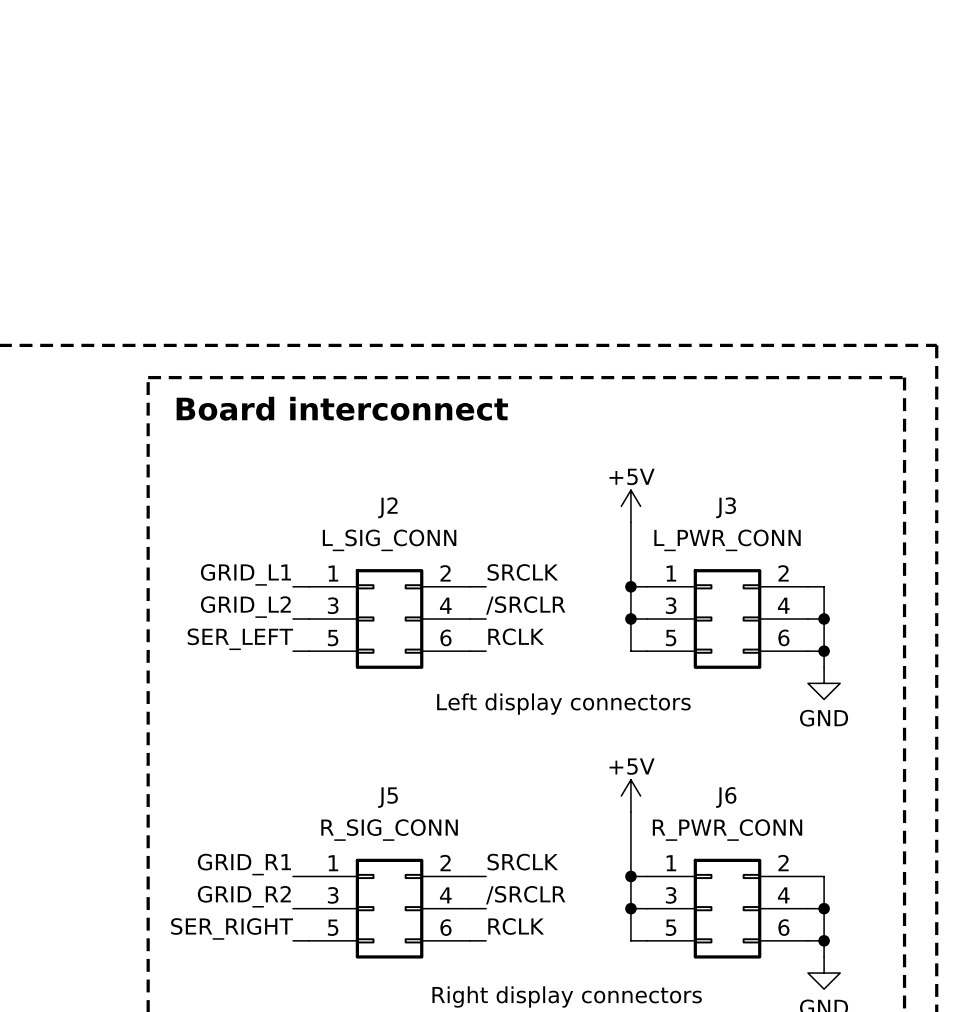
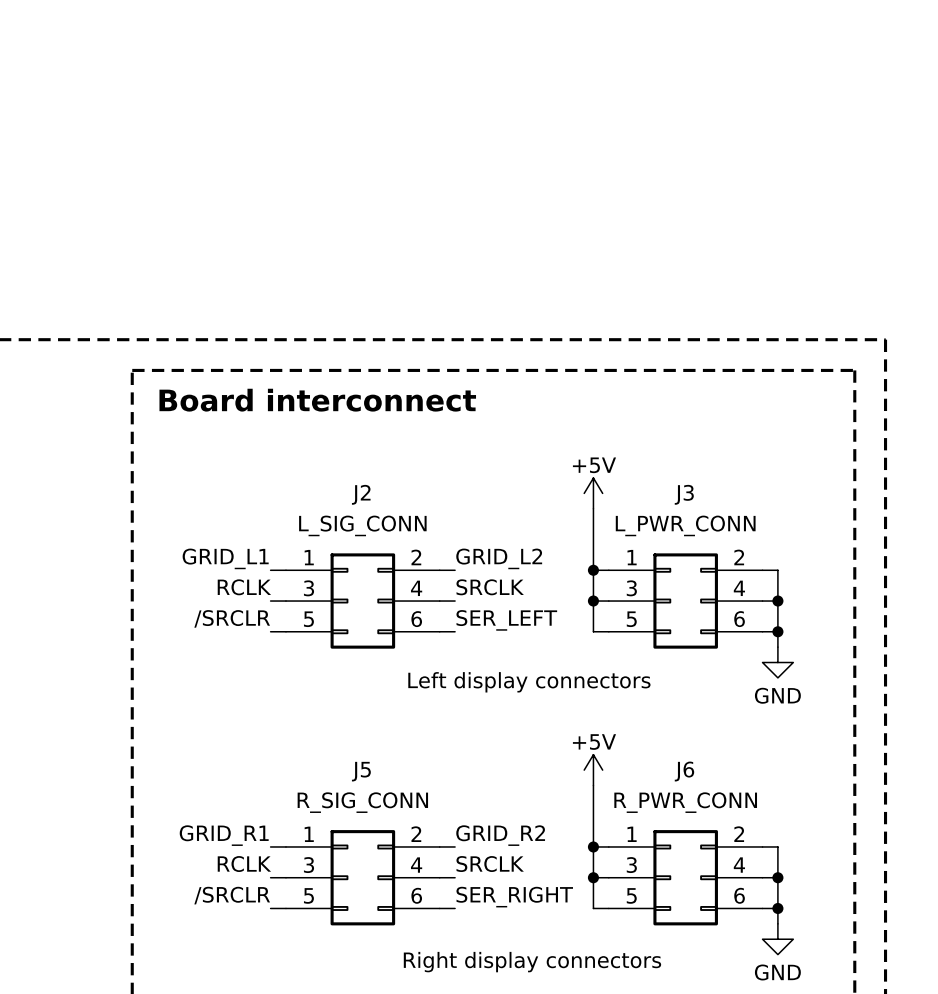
label: SRCLK (522, 572) -> GRID_L2 (499, 558)
label: /SRCLR (525, 605) -> SRCLK (490, 587)
label: GRID_L2 (245, 607) -> RCLK (244, 587)
label: RCLK (516, 636) -> SER_LEFT (506, 620)
label: SER_LEFT (240, 639) -> /SRCLR (232, 618)
label: SRCLK (522, 862) -> GRID_R2 (500, 835)
label: /SRCLR (525, 895) -> SRCLK (490, 864)
label: GRID_R2 (244, 896) -> RCLK (244, 864)
label: RCLK (516, 926) -> SER_RIGHT (514, 897)
label: SER_RIGHT (232, 928) -> /SRCLR (232, 895)

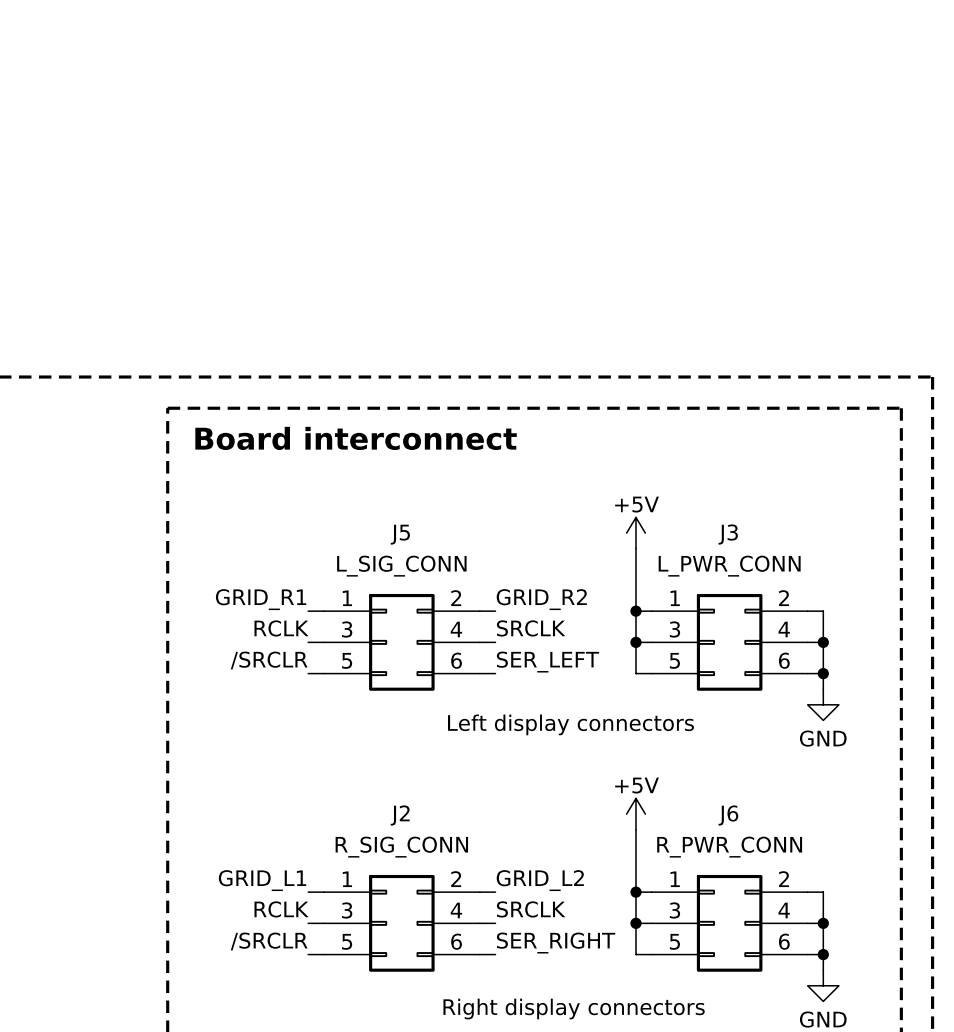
J2 name: J2 (361, 494) -> J5 (400, 534)
label: GRID_L1 (225, 558) -> GRID_R1 (261, 599)
label: GRID_L2 (499, 558) -> GRID_R2 (541, 599)
J5 name: J5 (361, 771) -> J2 (400, 815)
label: GRID_R1 (224, 835) -> GRID_L1 (262, 880)
label: GRID_R2 (500, 835) -> GRID_L2 (540, 880)

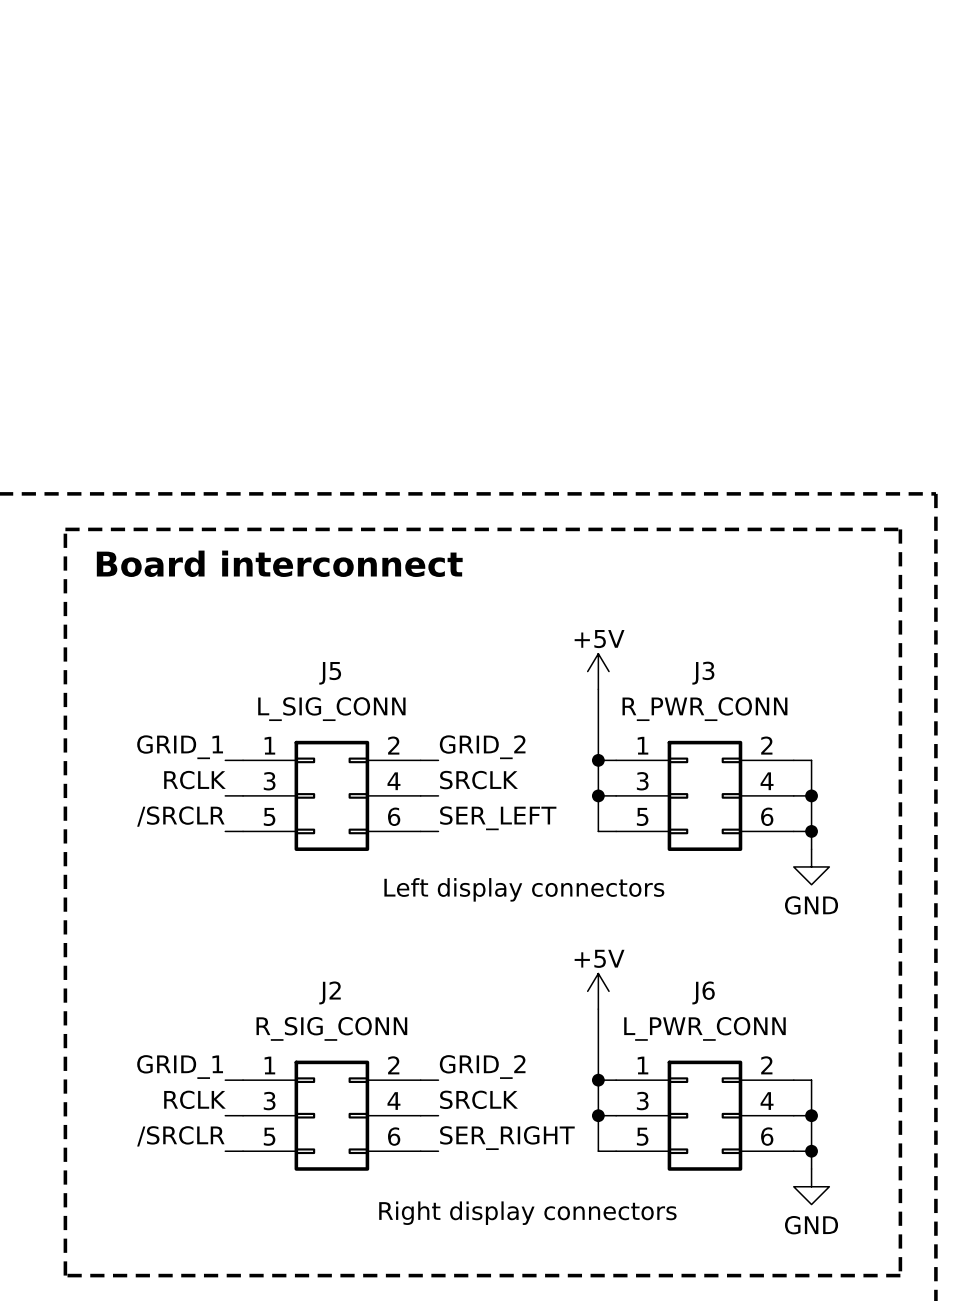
J3 value: L_PWR_CONN (729, 566) -> R_PWR_CONN (704, 709)
label: GRID_R1 (261, 599) -> GRID_1 (180, 747)
label: GRID_R2 (541, 599) -> GRID_2 (482, 747)
J6 value: R_PWR_CONN (729, 847) -> L_PWR_CONN (704, 1028)
label: GRID_L1 (262, 880) -> GRID_1 (180, 1067)
label: GRID_L2 (540, 880) -> GRID_2 (482, 1067)

